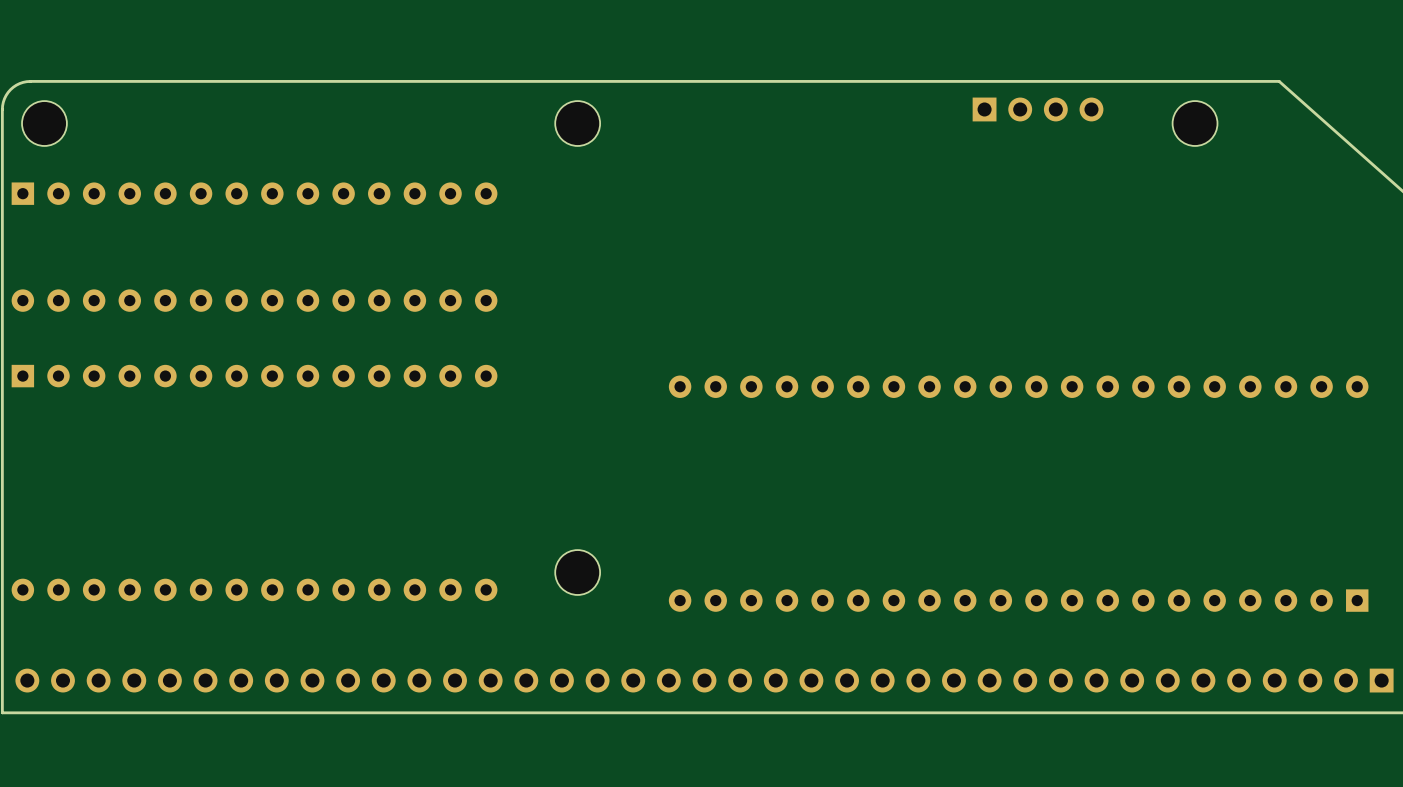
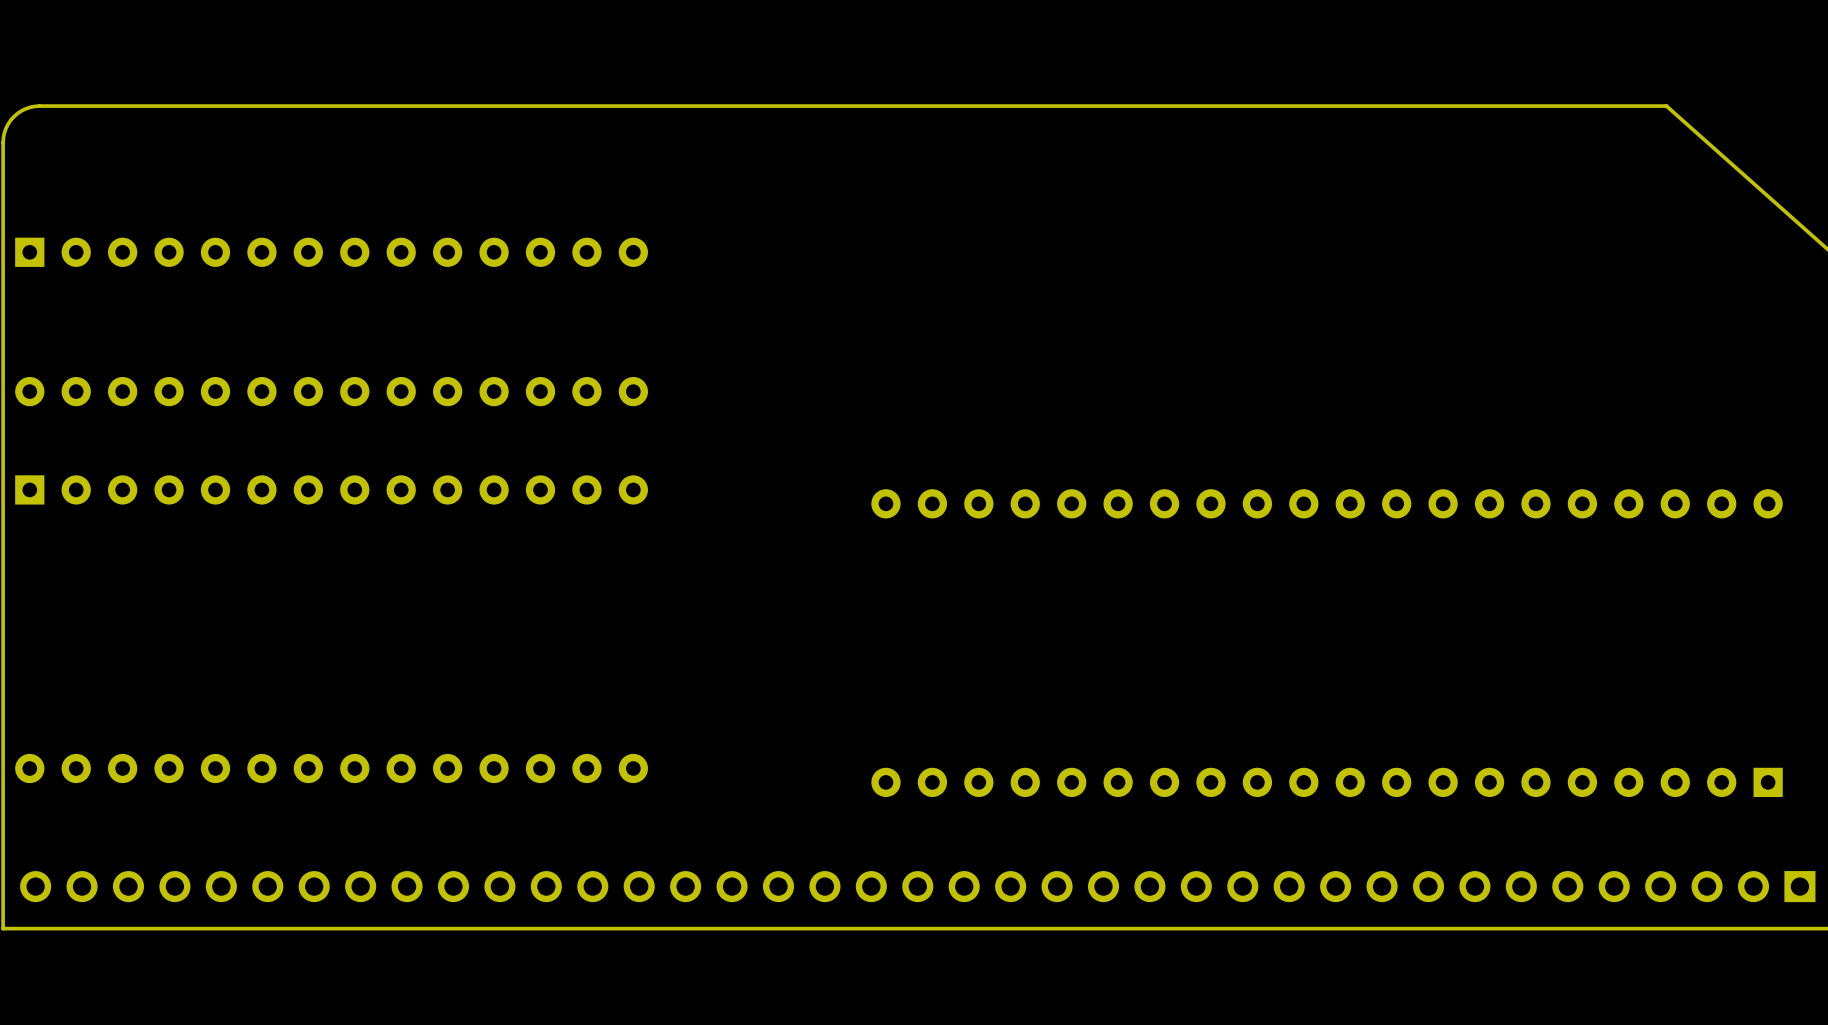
part: (1038, 109) -> none
part: (44, 123) -> none
part: (577, 123) -> none
part: (1195, 123) -> none
part: (577, 572) -> none

